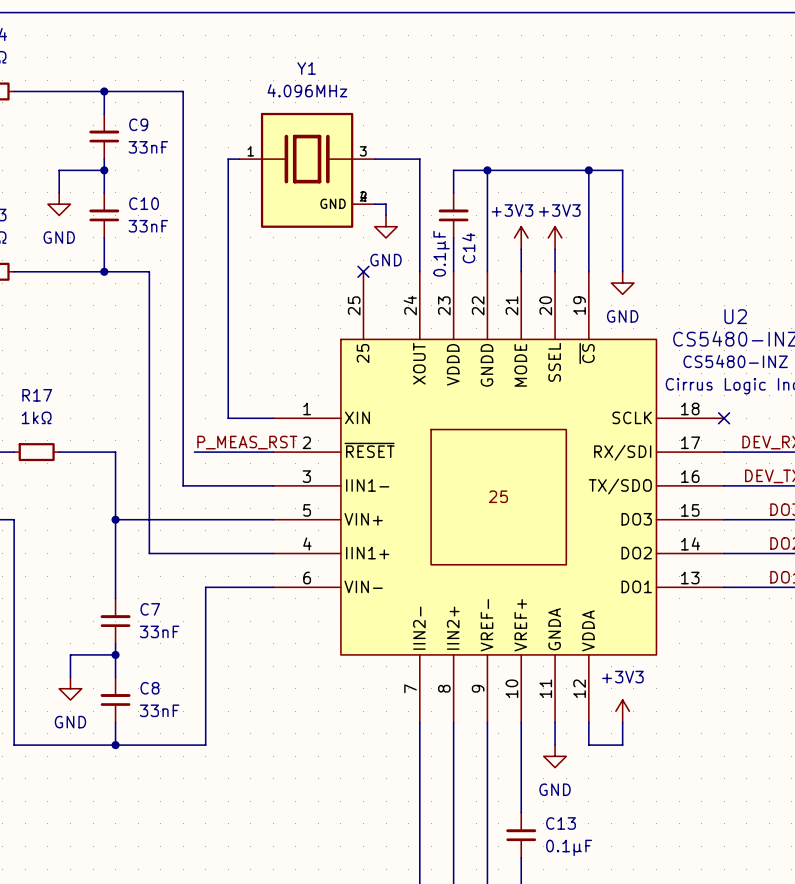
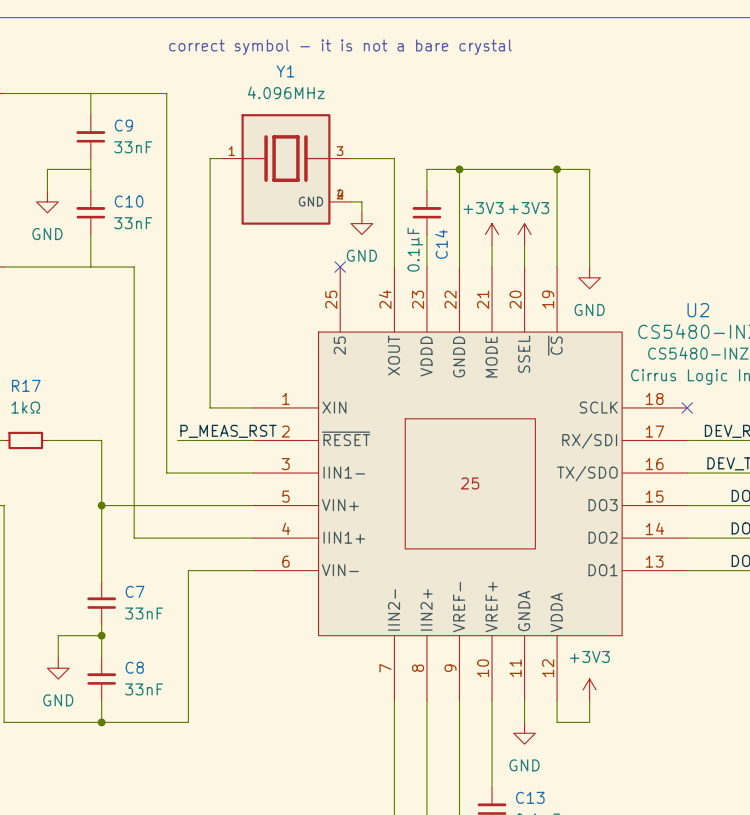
text: none -> correct symbol - it is not a bare crystal (340, 47)
junction: (104, 91) -> none
junction: (104, 170) -> none
junction: (104, 271) -> none

